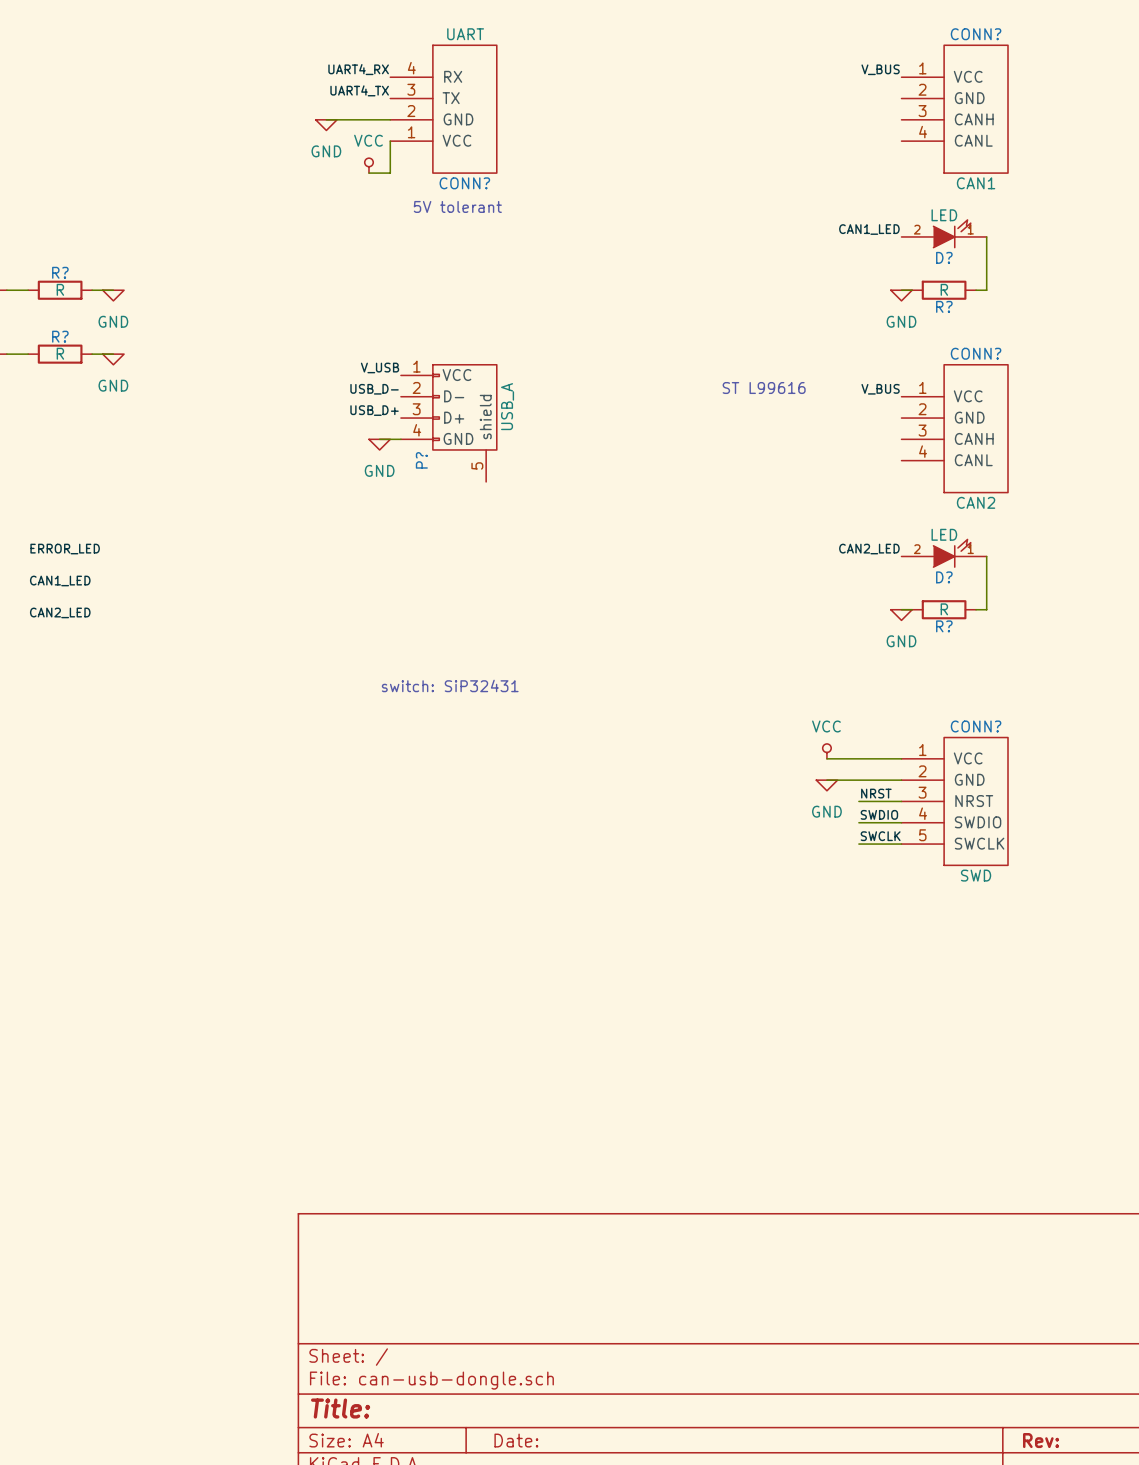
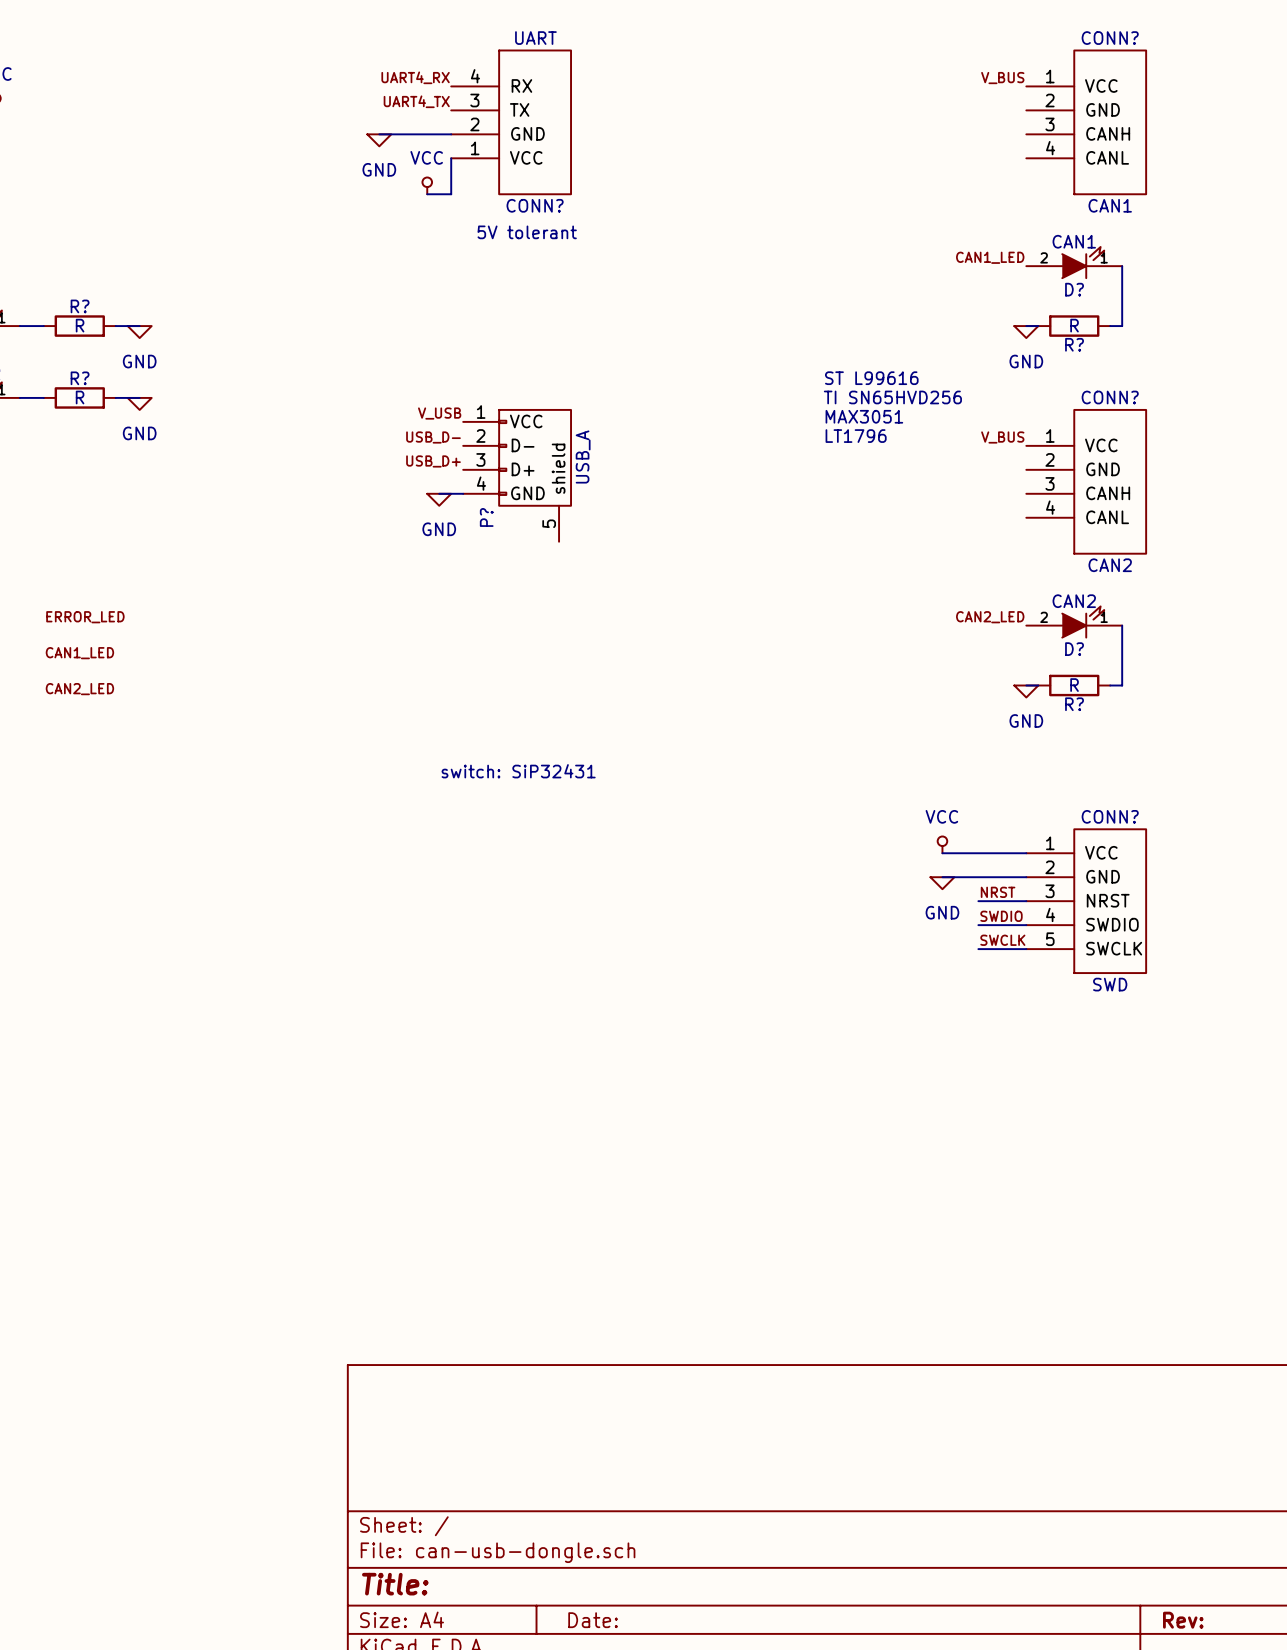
D? value: LED (944, 215) -> CAN1 (1074, 241)
text: none -> ST L99616 (871, 378)
text: none -> TI SN65HVD256 (892, 397)
text: none -> MAX3051 (864, 416)
text: ST L99616 (764, 388) -> LT1796 (856, 436)
D? value: LED (944, 534) -> CAN2 (1074, 601)

